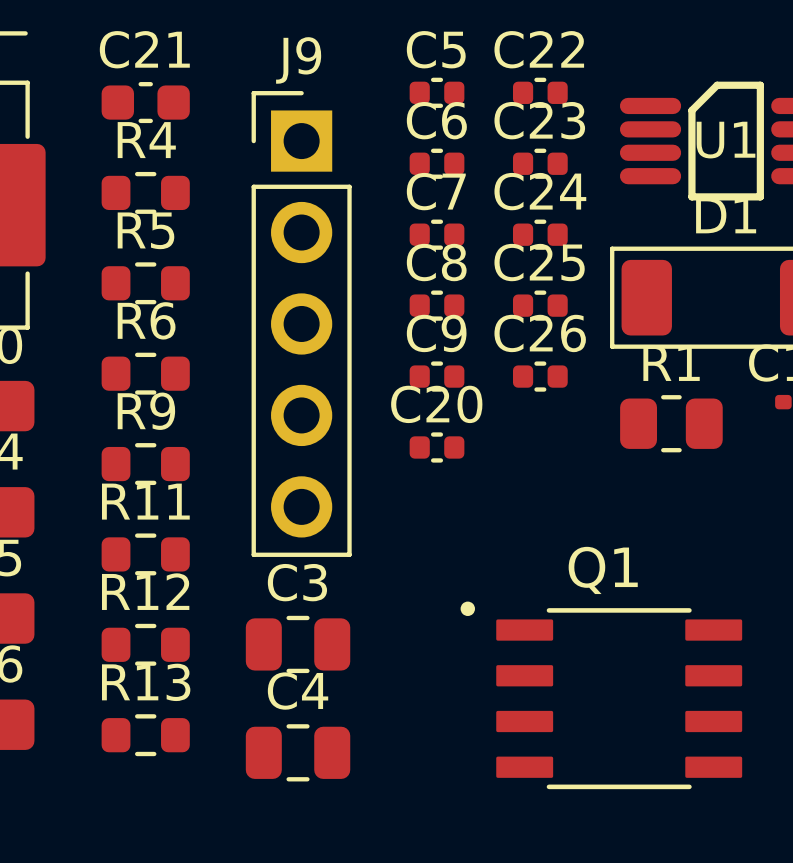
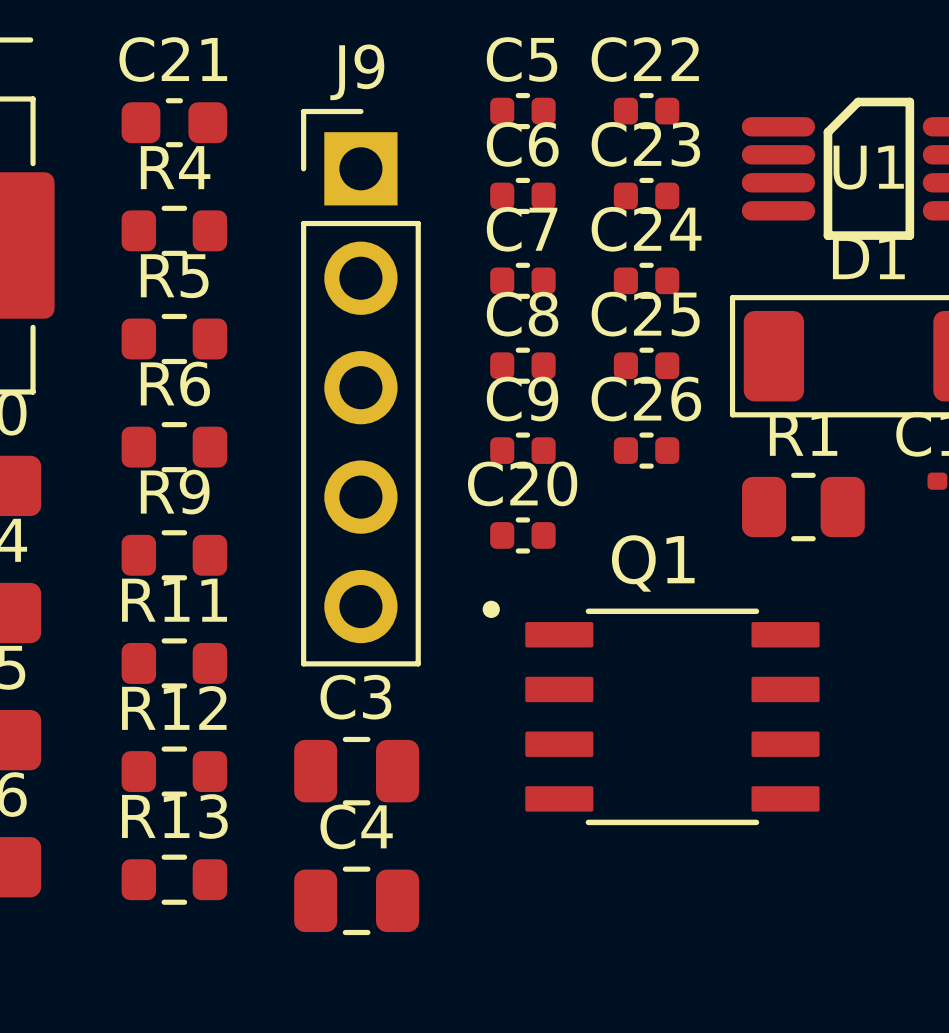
Q1 position: (601, 695) -> (651, 712)

